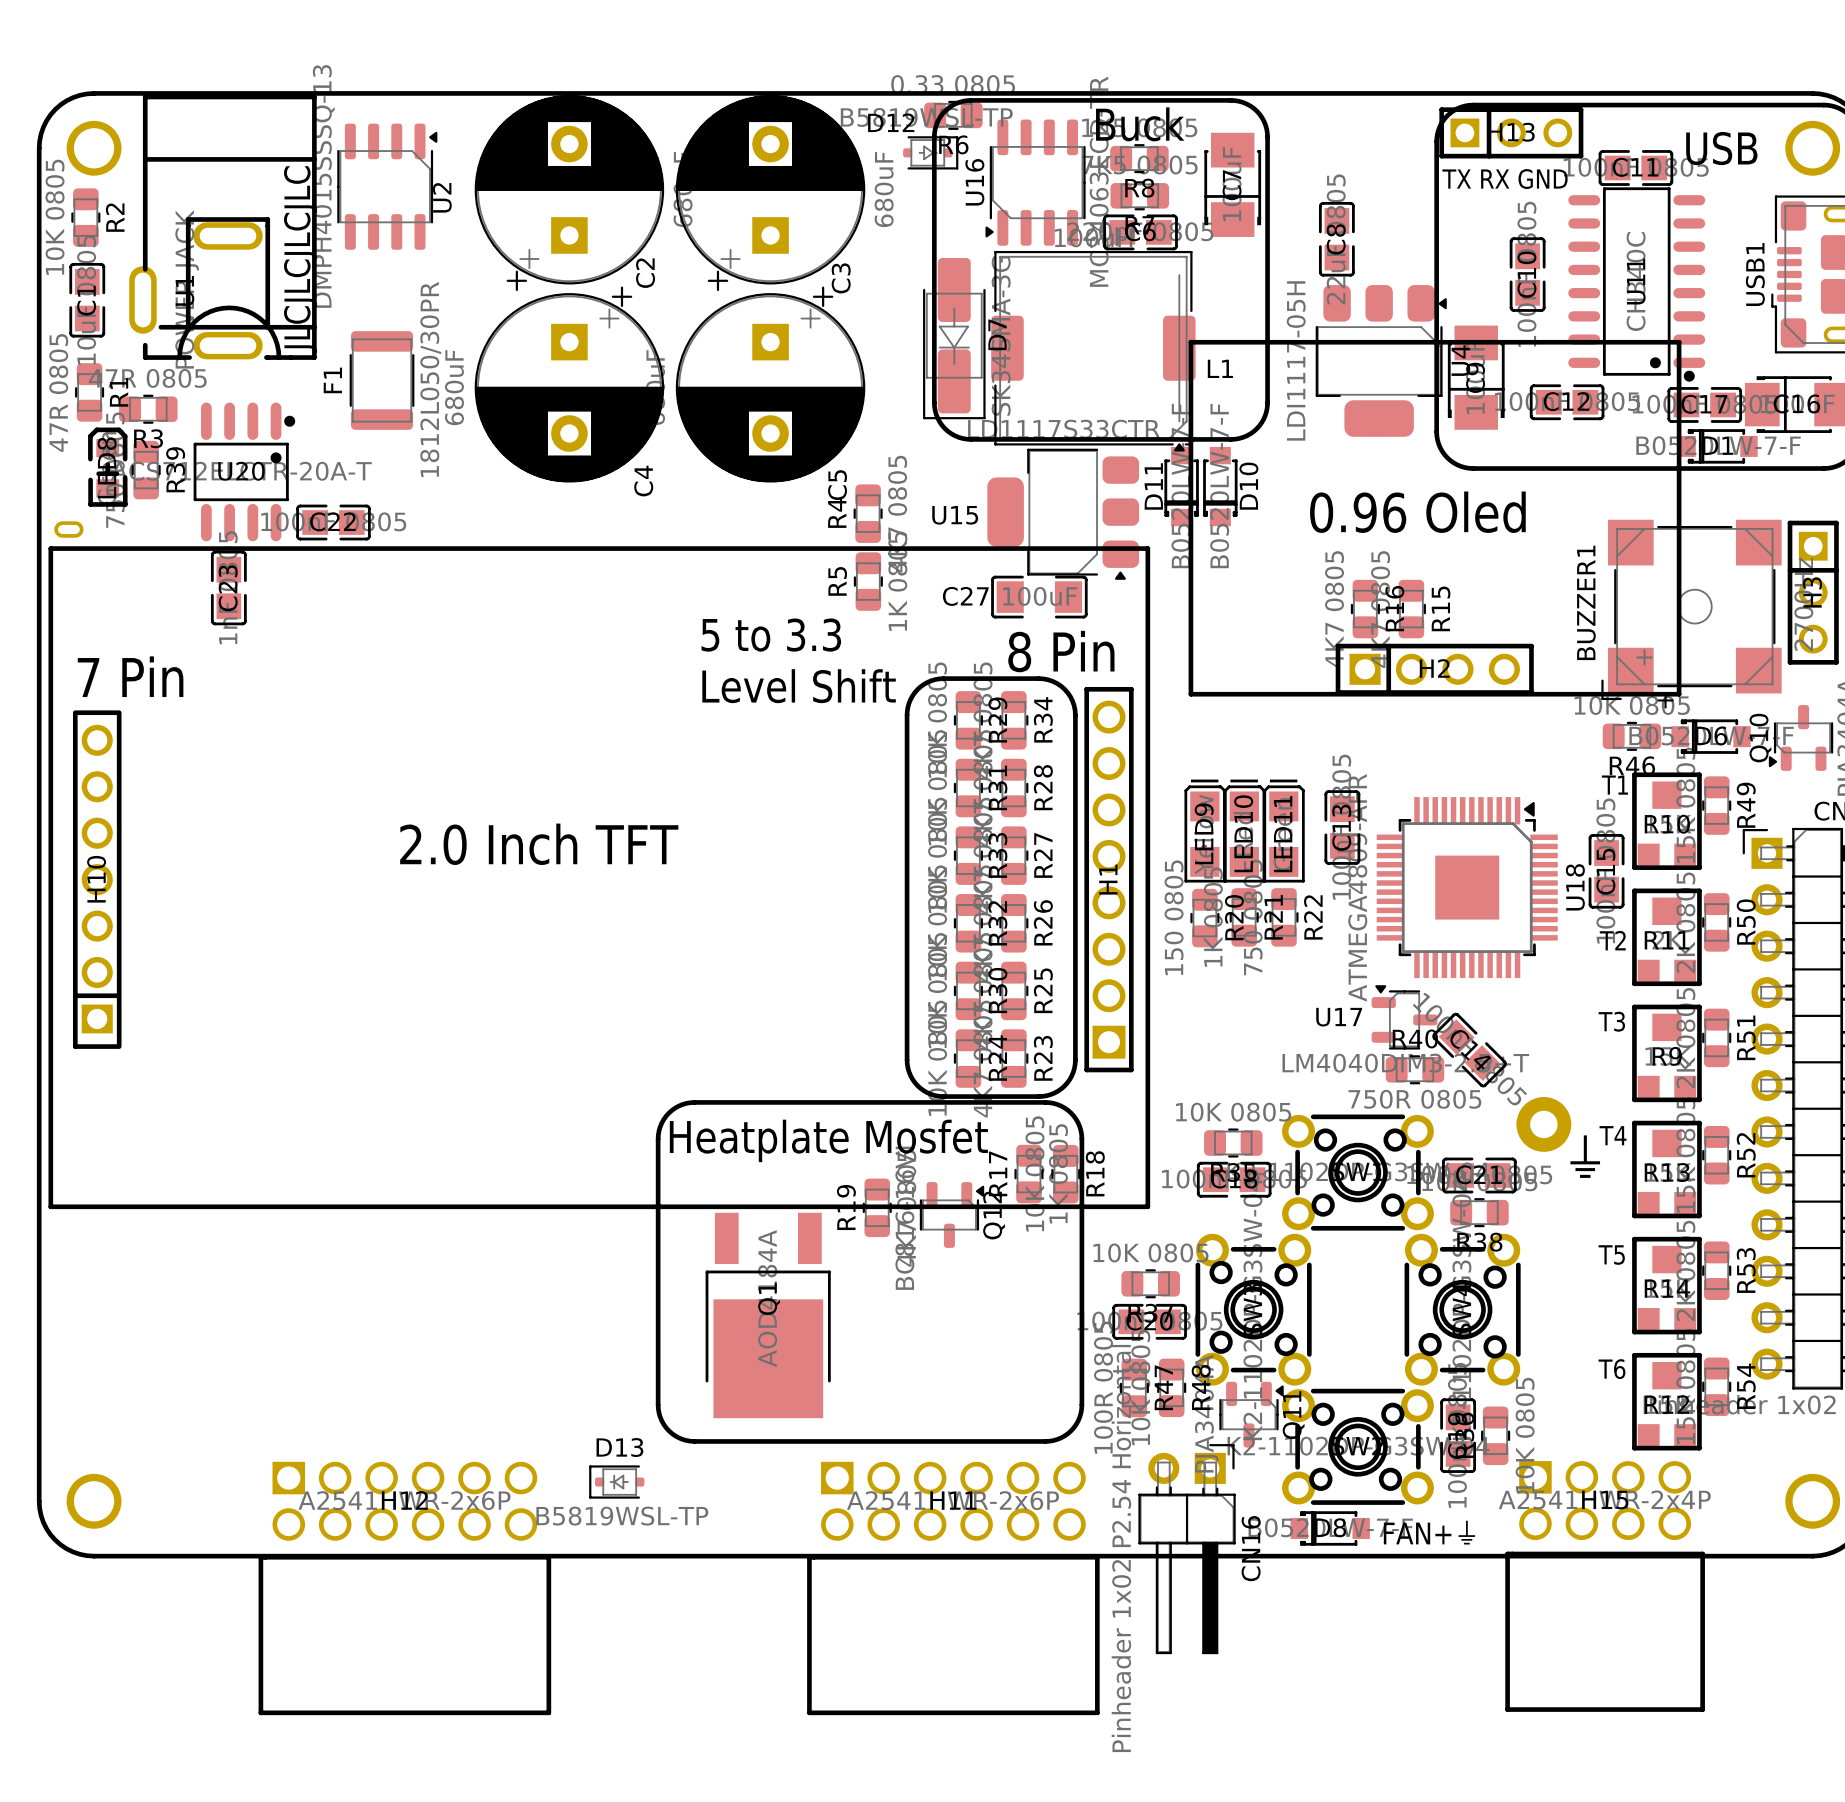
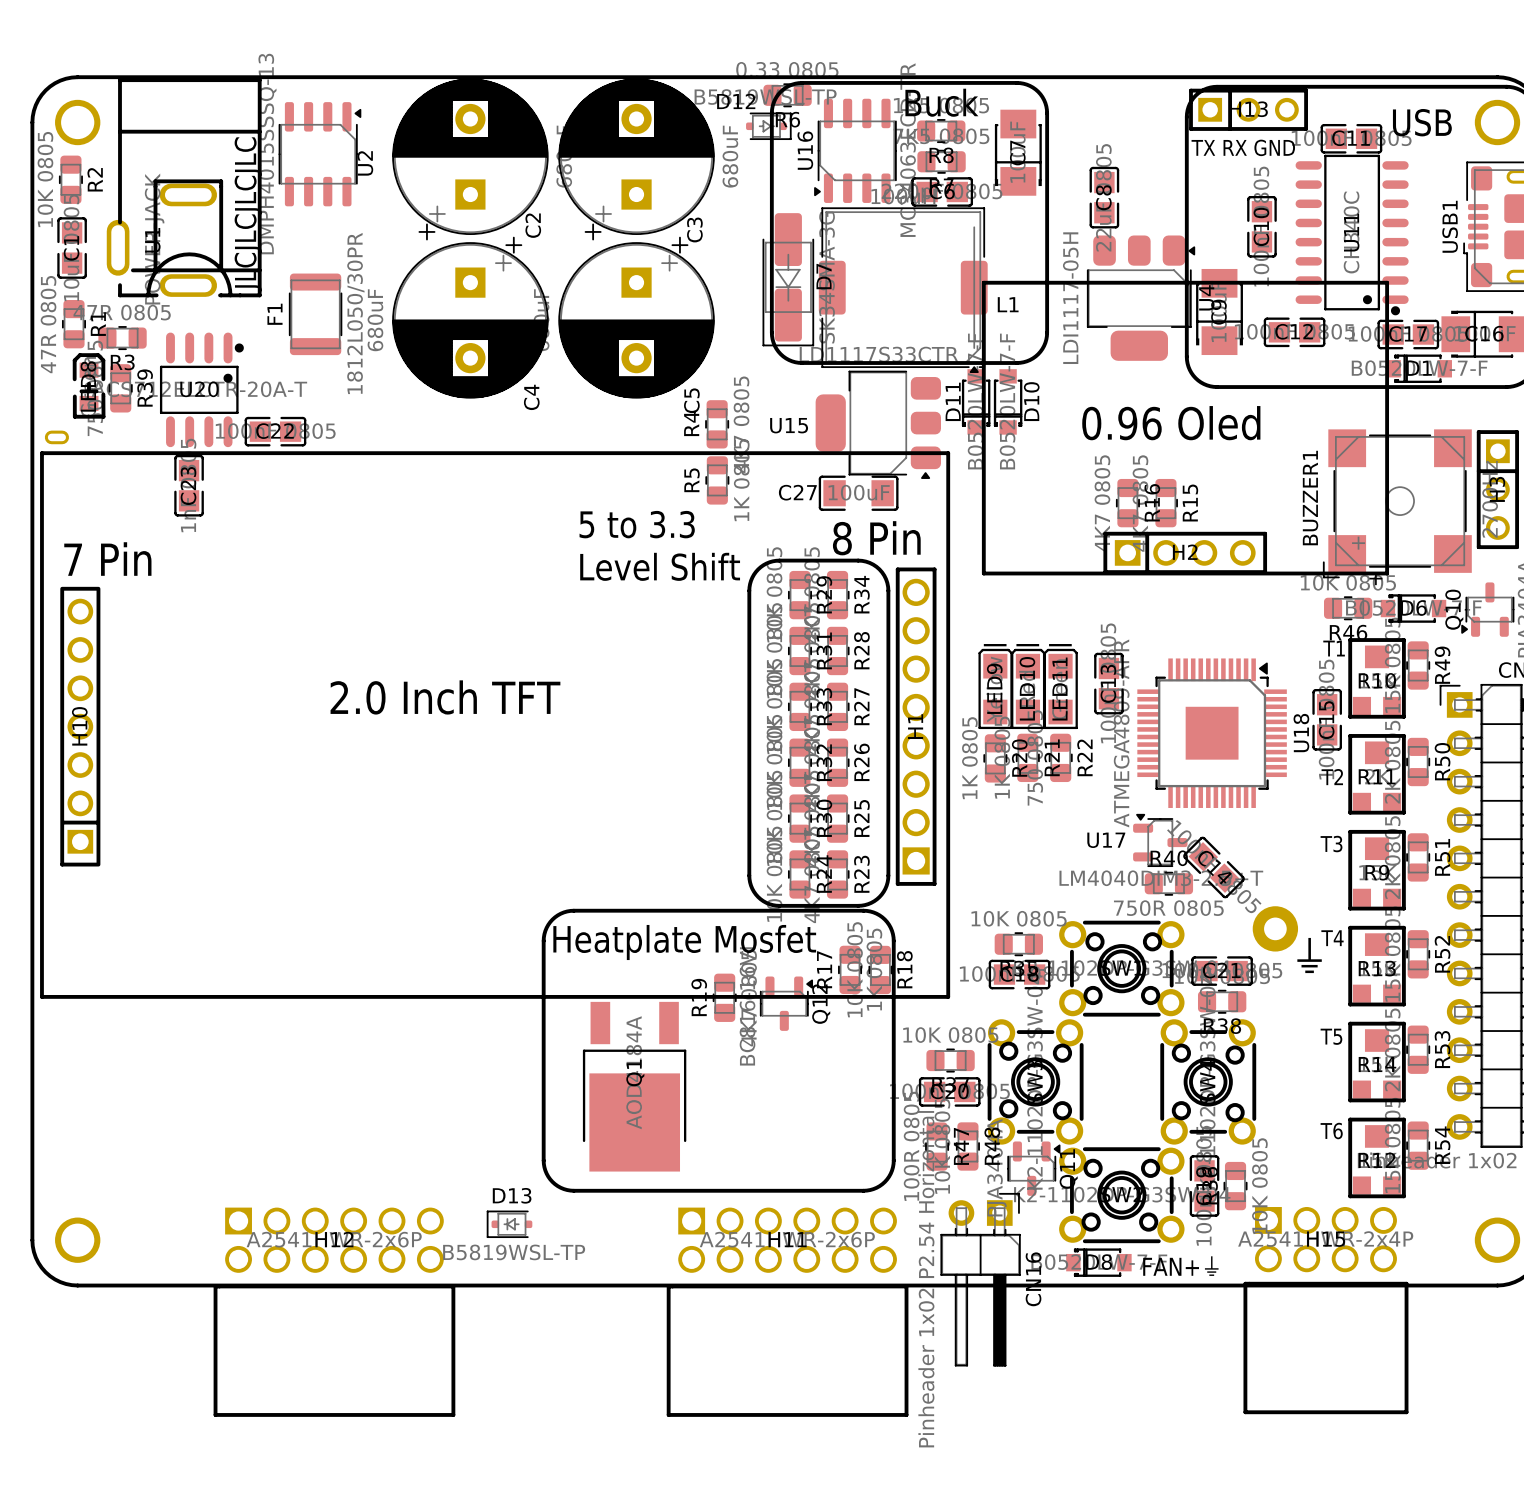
R20 value: 150 0805 (1174, 917) -> 1K 0805 (969, 758)

